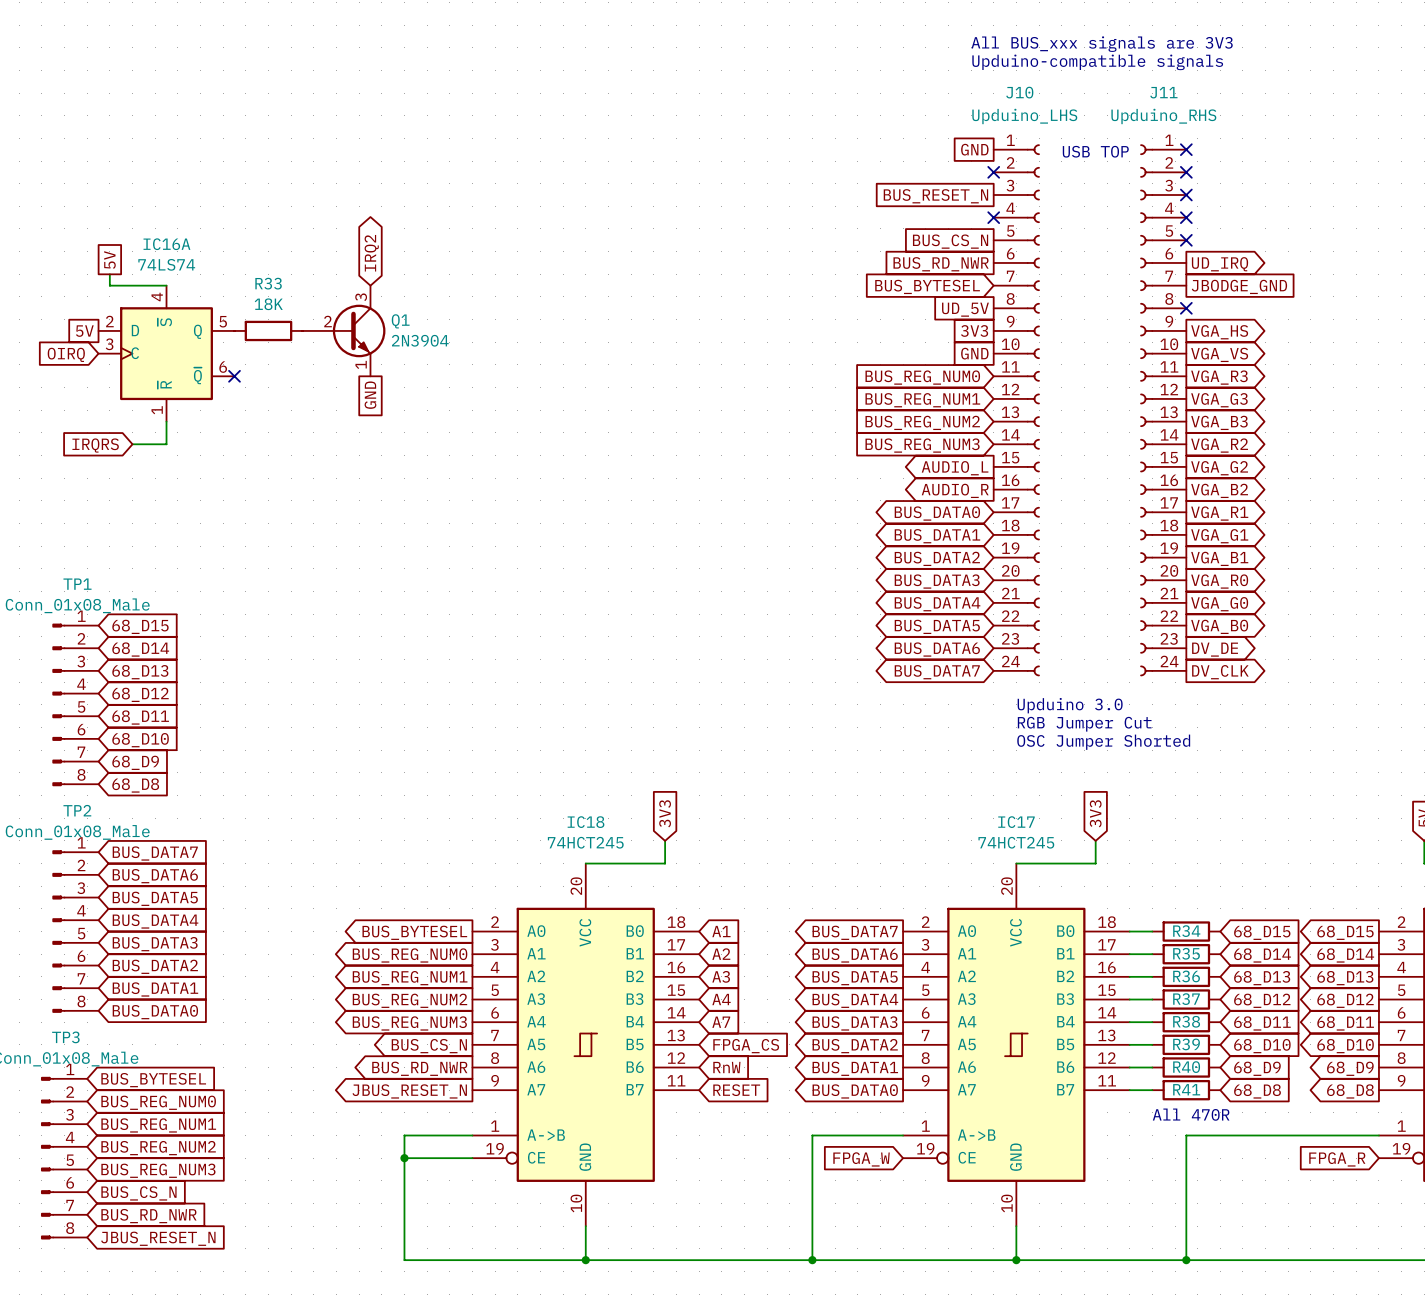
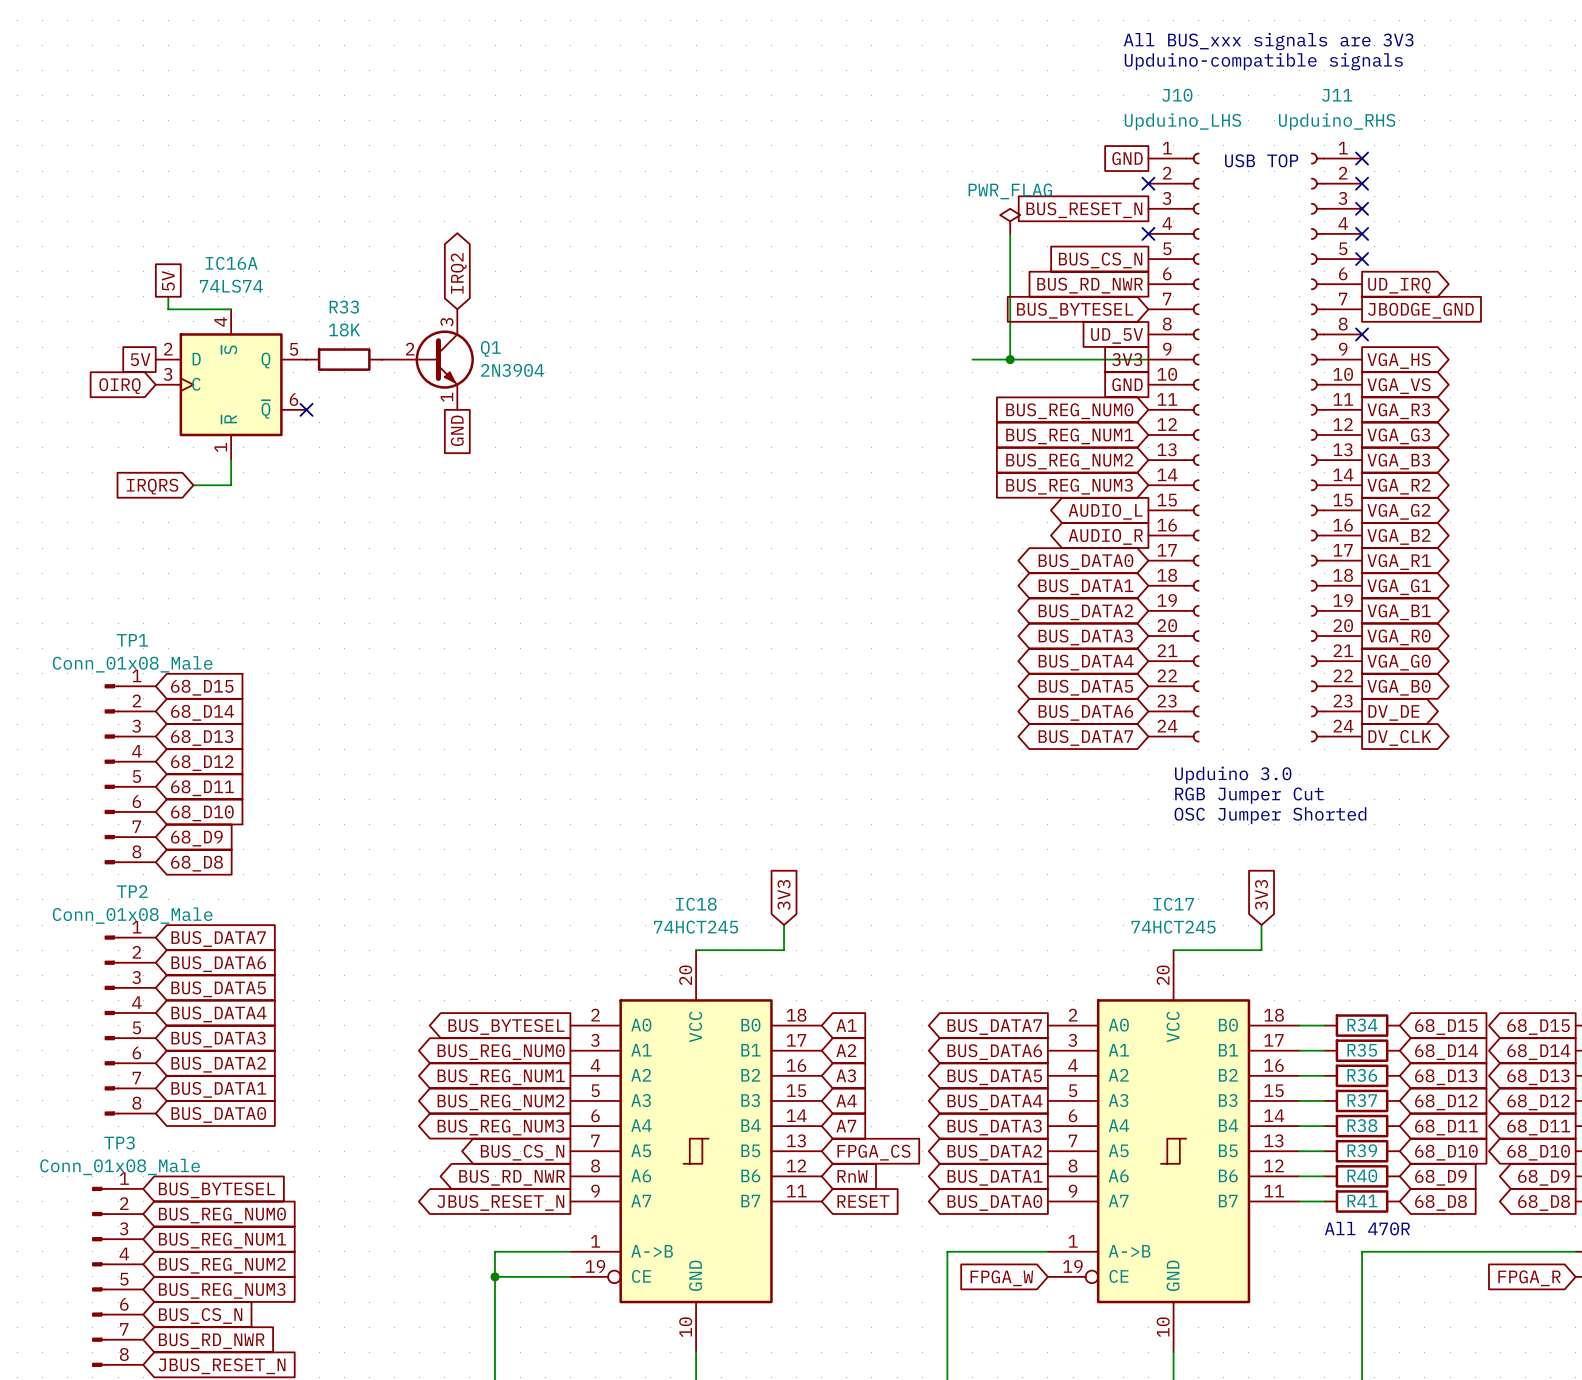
power symbol: none -> PWR_FLAG (1010, 221)
wire: none -> (1010, 233) (1010, 359)
wire: none -> (972, 359) (1148, 359)
junction: none -> (1010, 359)

